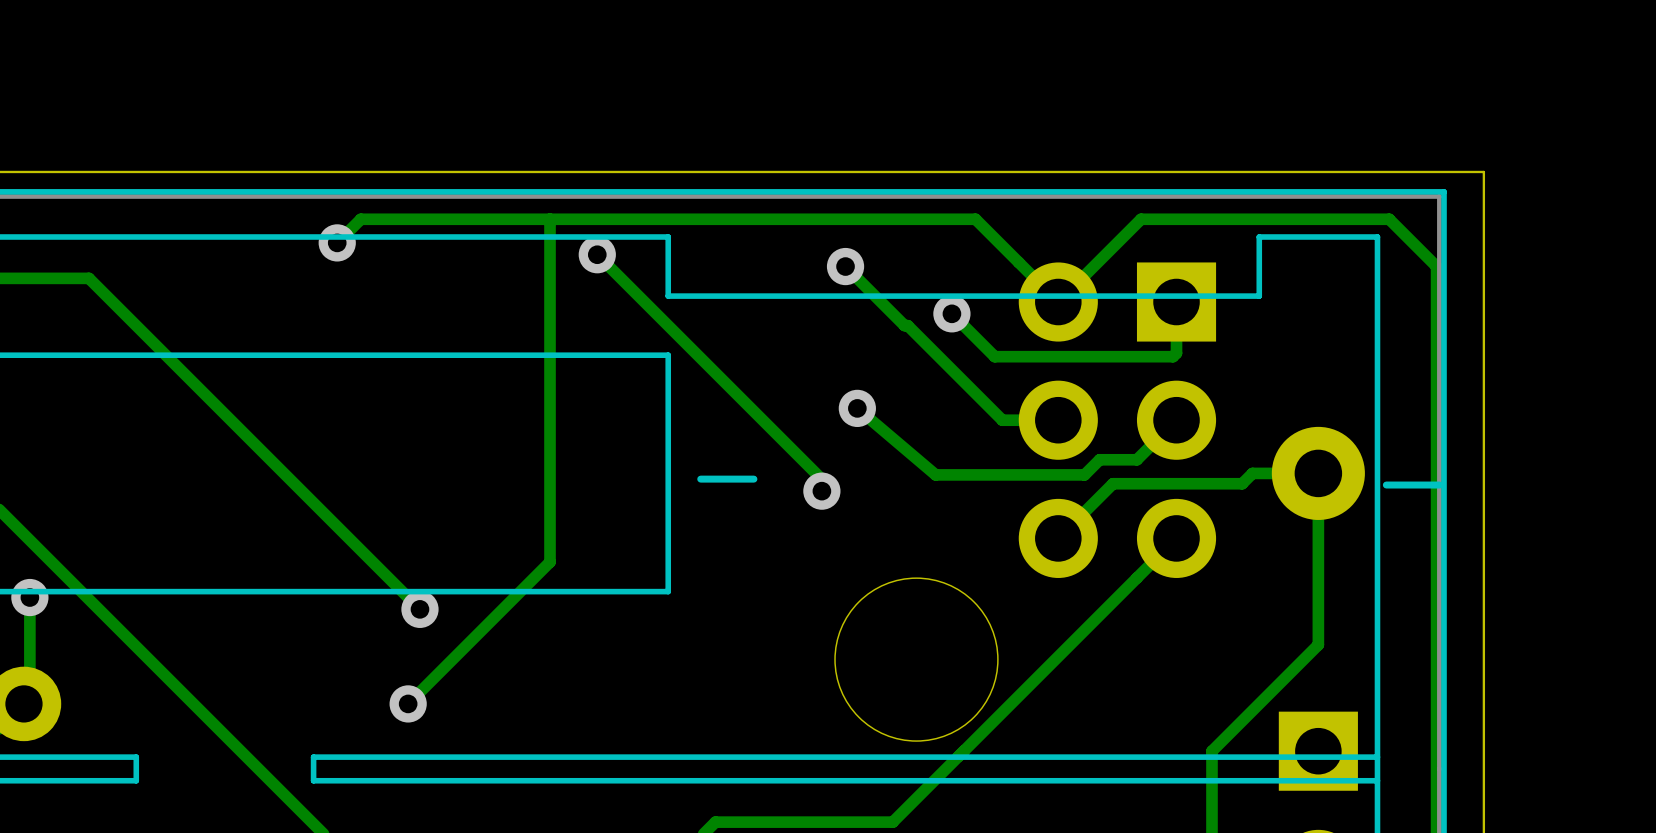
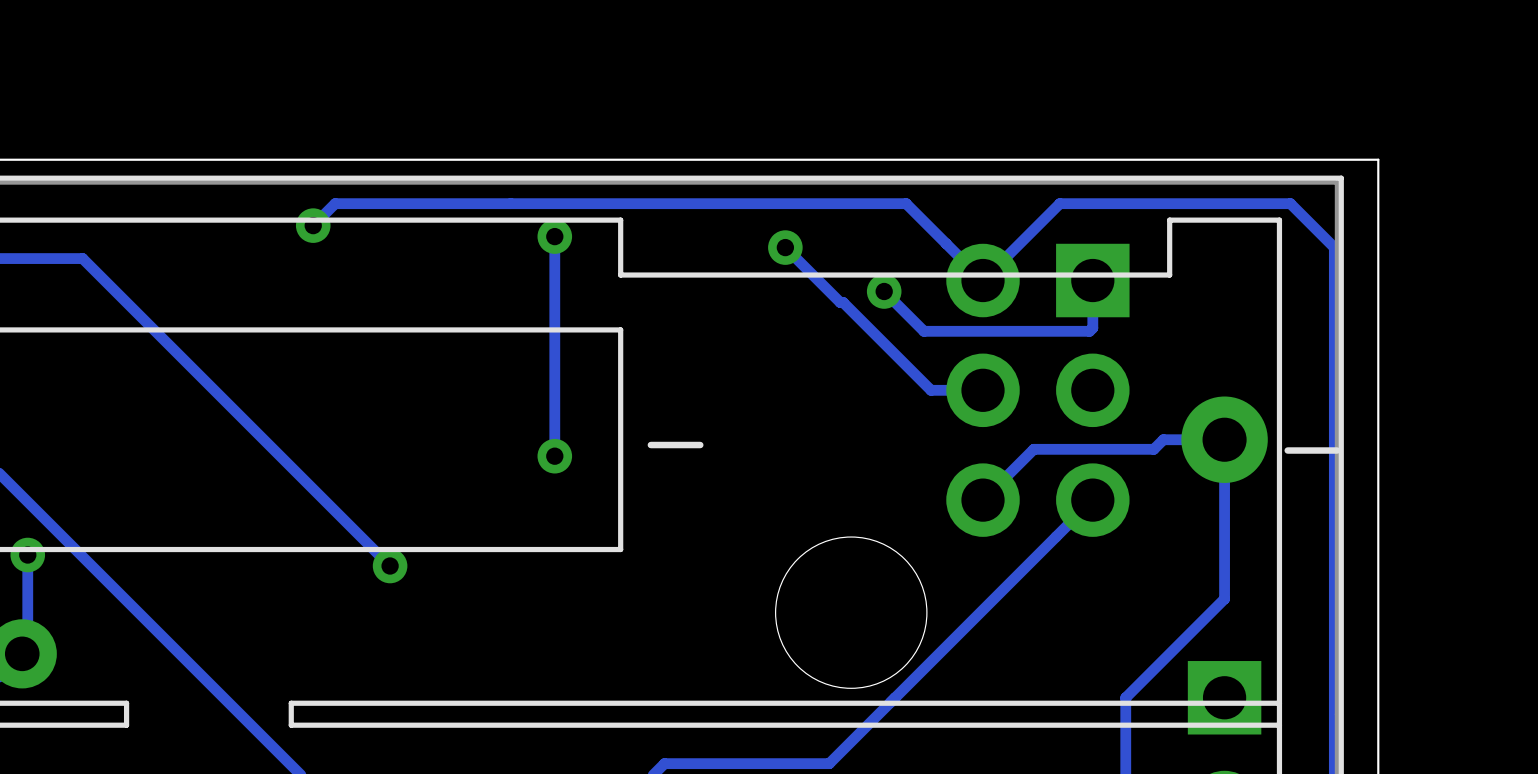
track: (550, 219) (550, 562) (408, 703) -> none
track: (597, 254) (821, 479) (821, 491) -> (554, 236) (554, 456)
track: (857, 408) (935, 474) (1084, 474) (1099, 459) (1136, 459) (1176, 420) -> none
via: (857, 408) -> none
via: none -> (554, 456)
via: (821, 491) -> none
via: (408, 703) -> none

